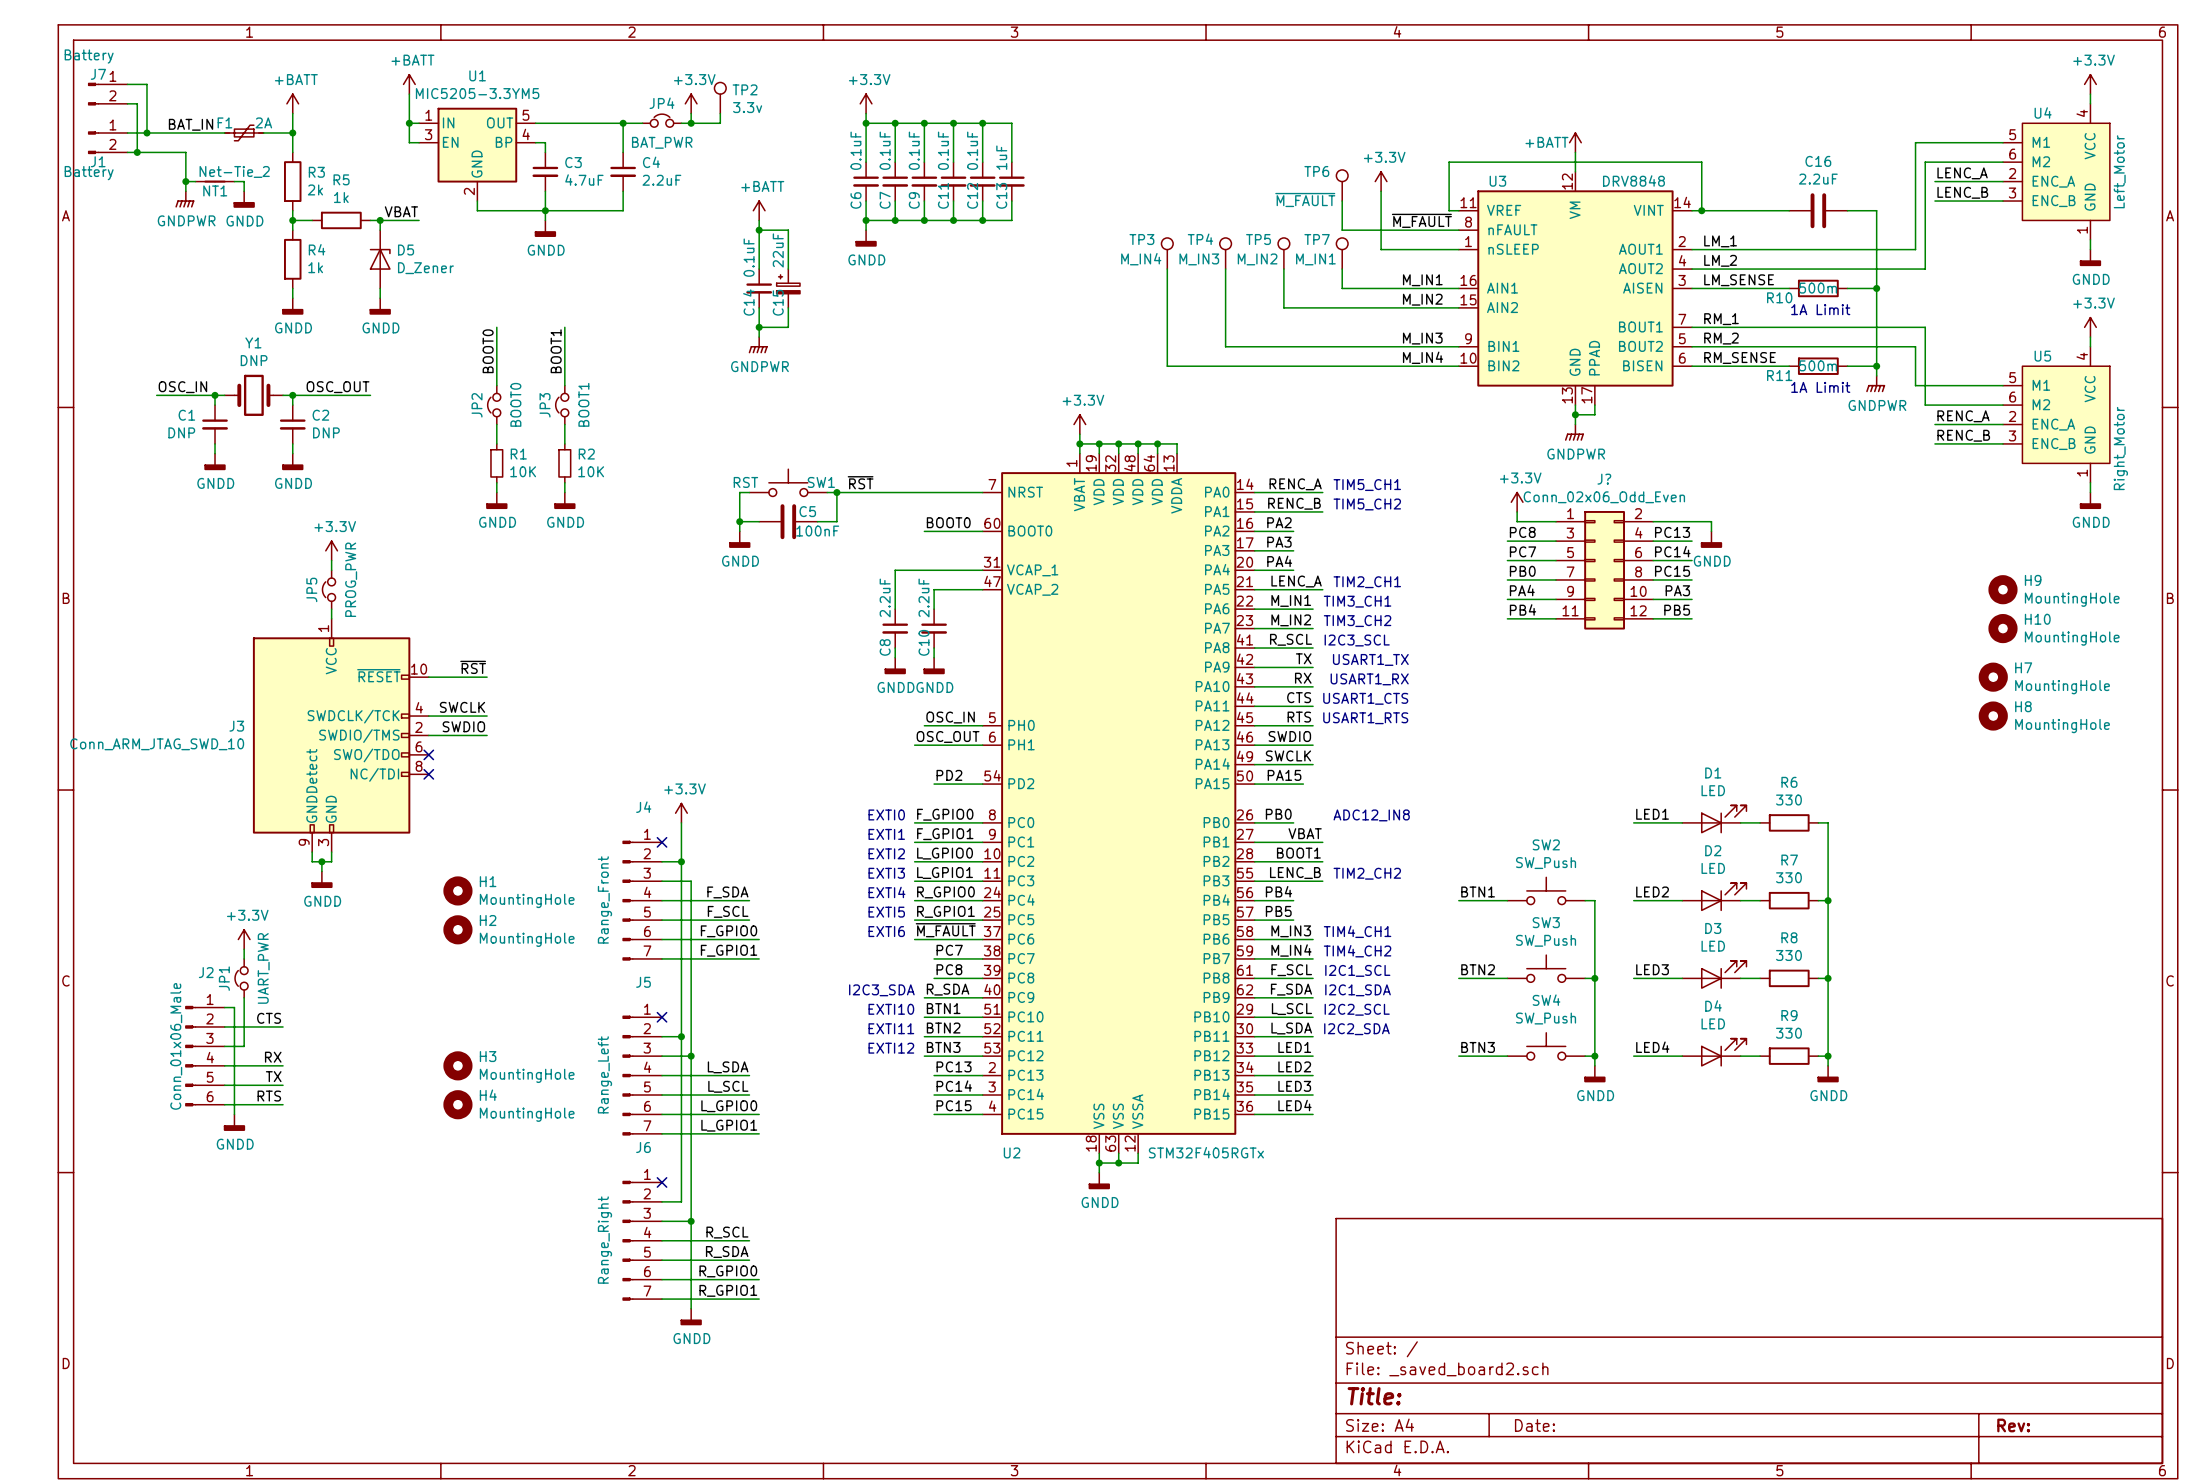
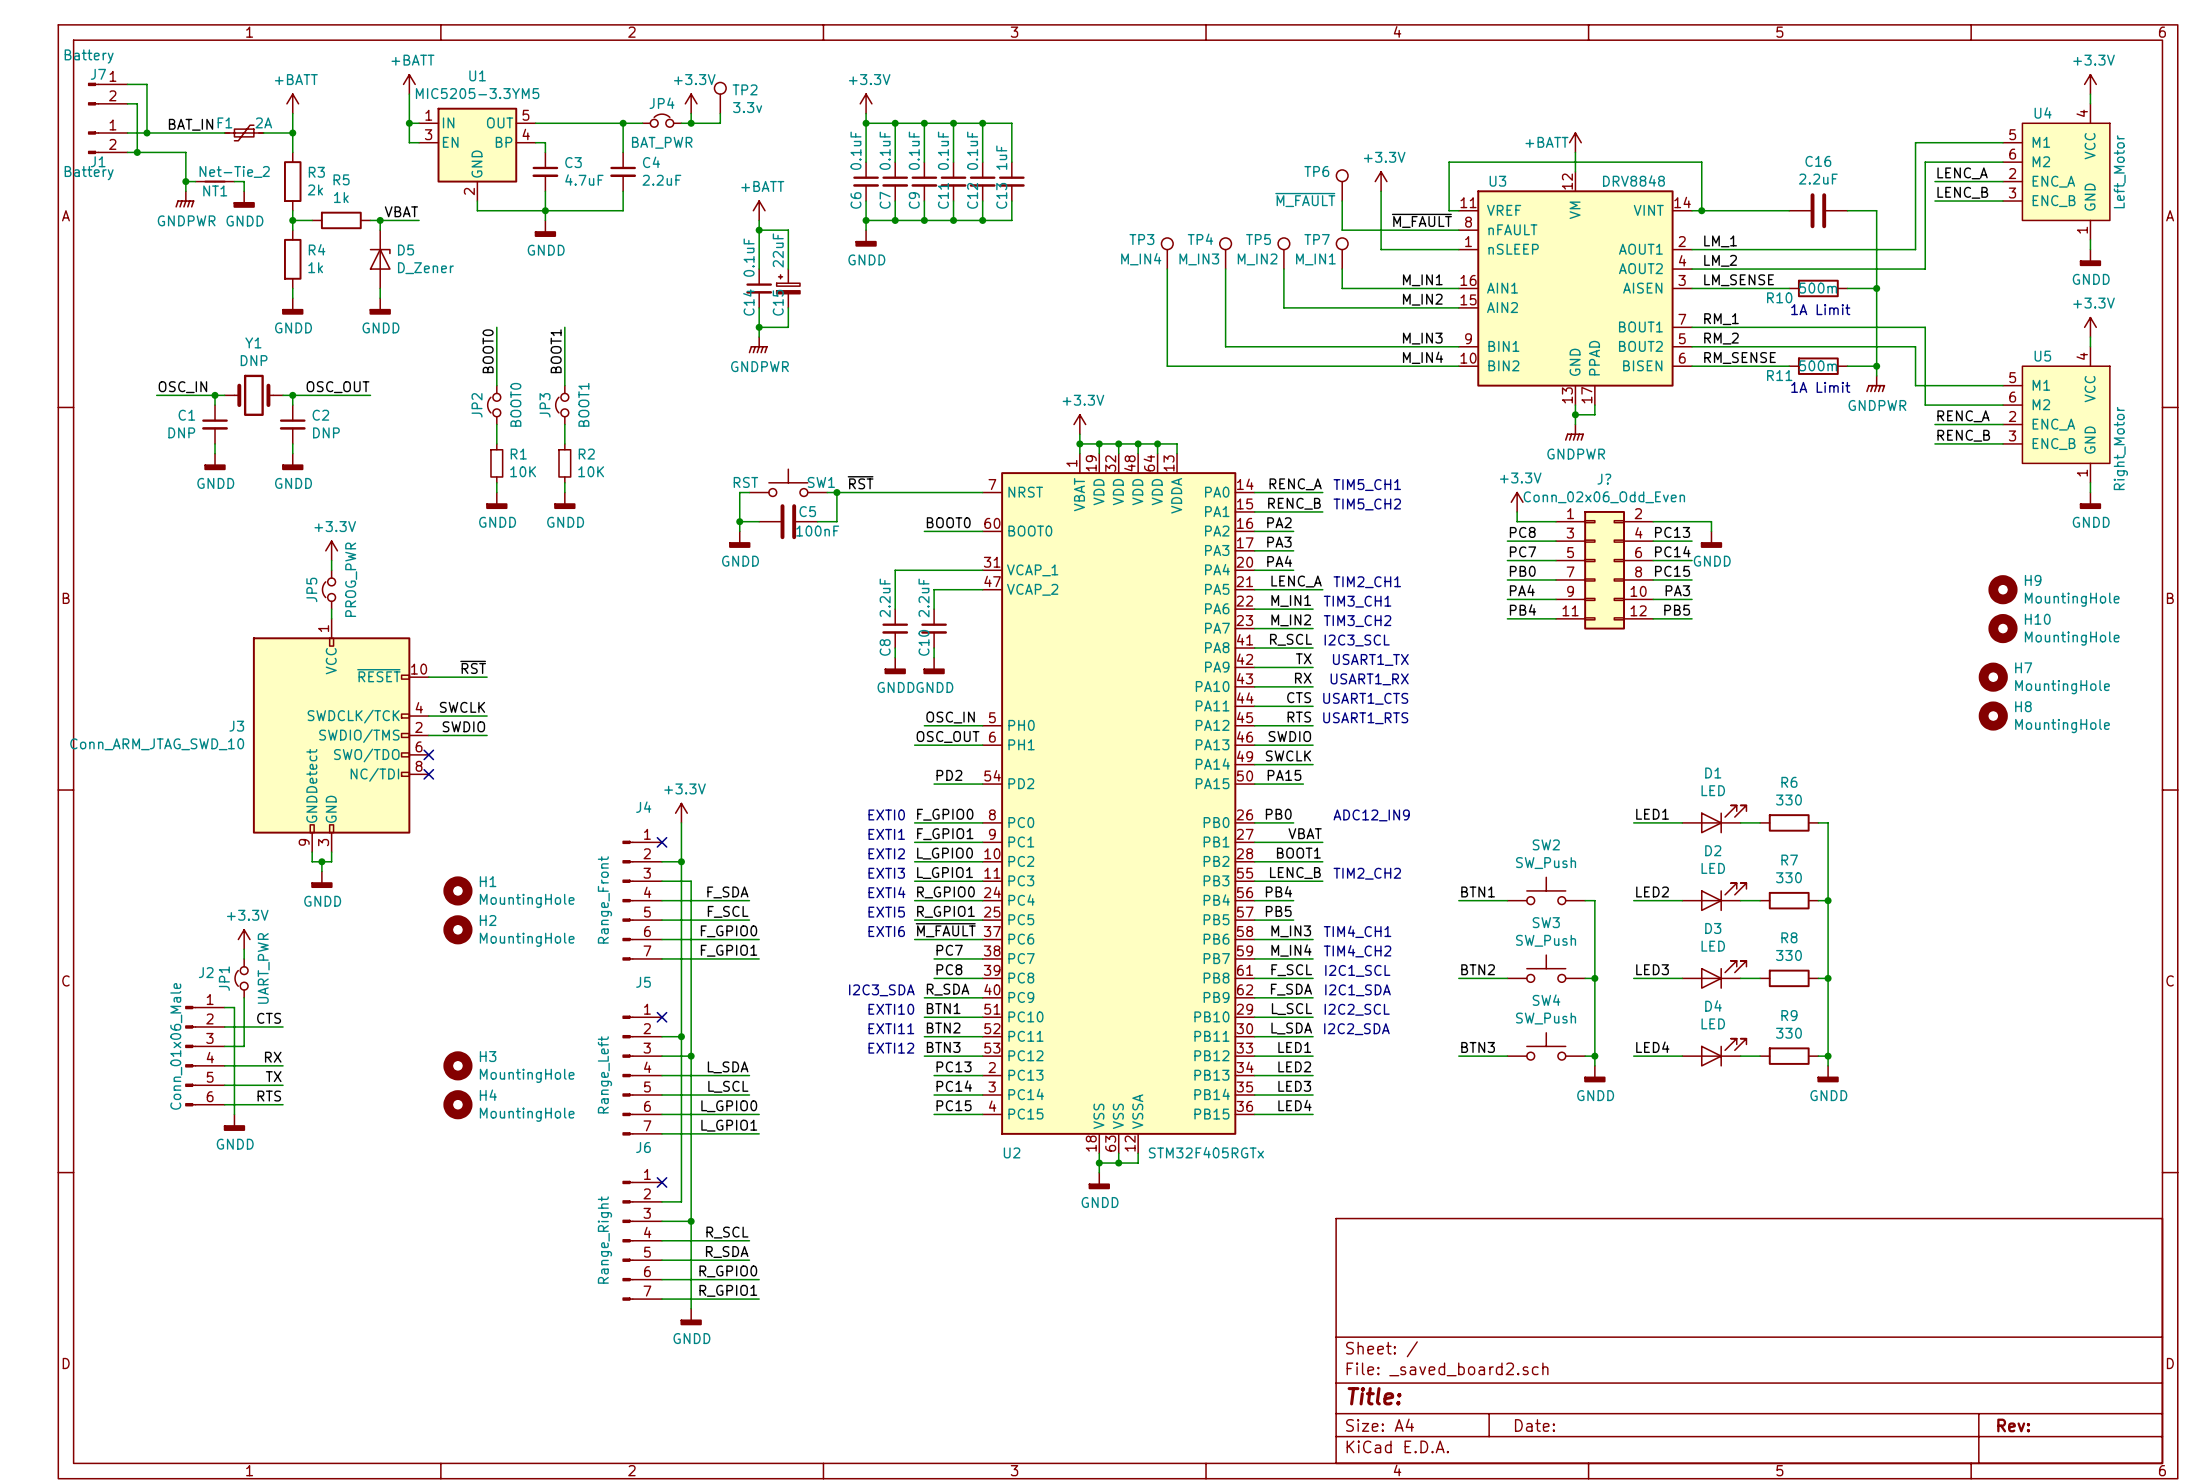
text: ADC12_IN8 (1371, 815) -> ADC12_IN9 (1371, 815)

